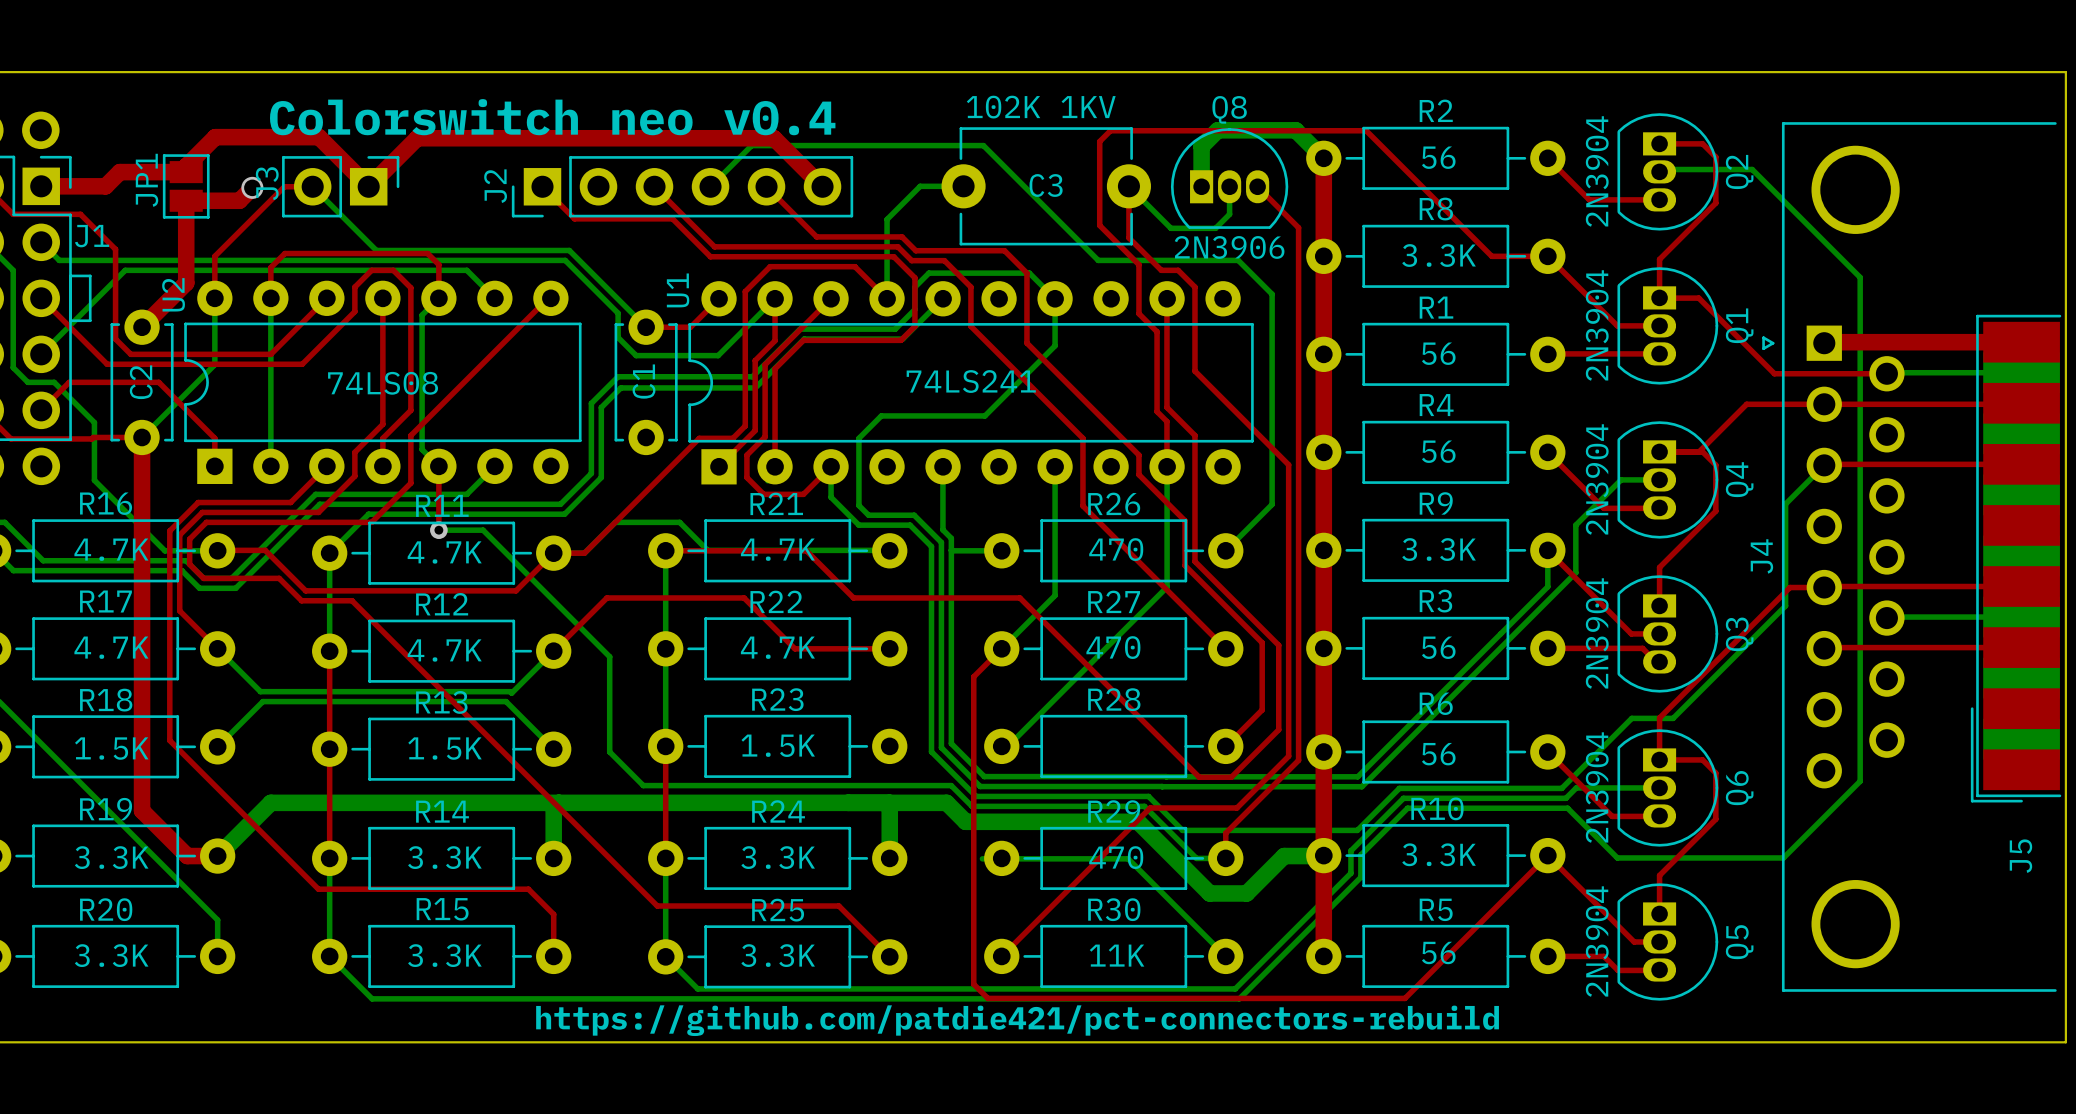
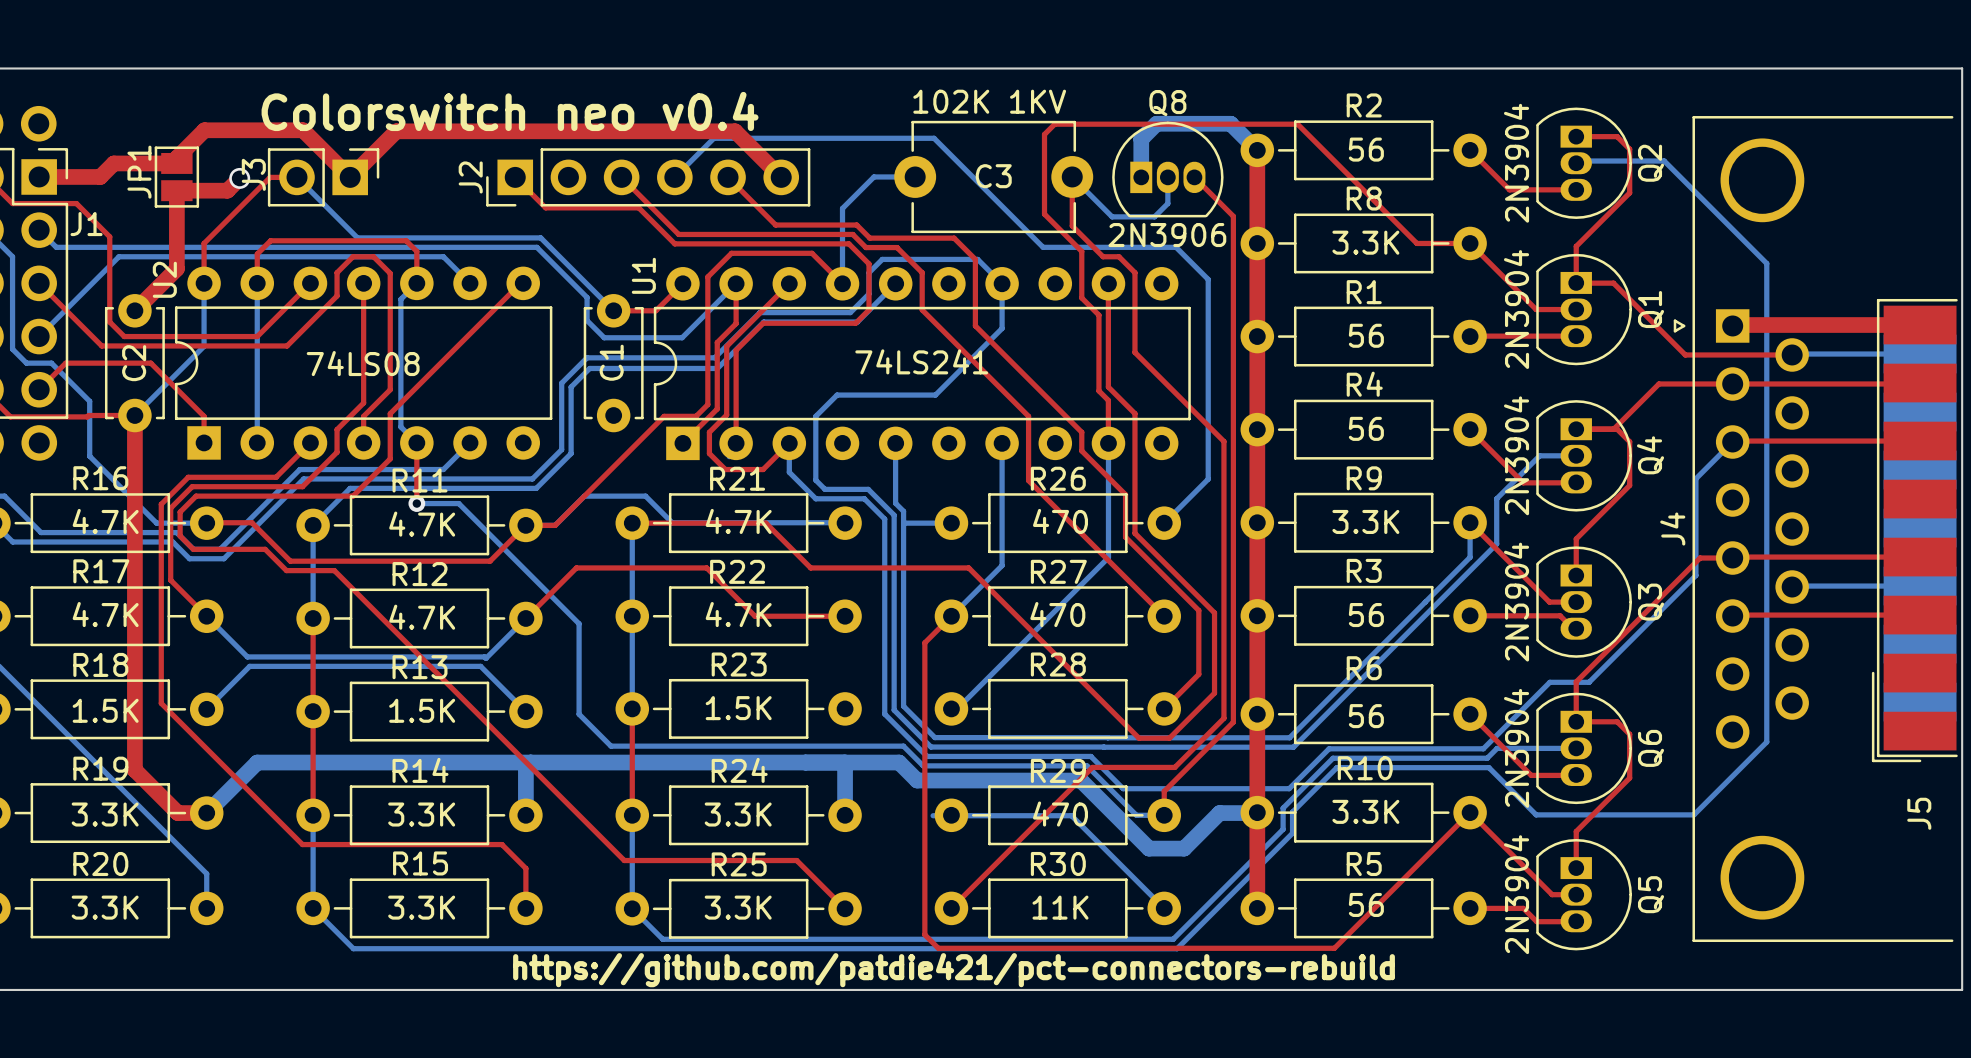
line: (70, 275) (90, 275) (90, 320) (70, 320) (70, 275) -> none

